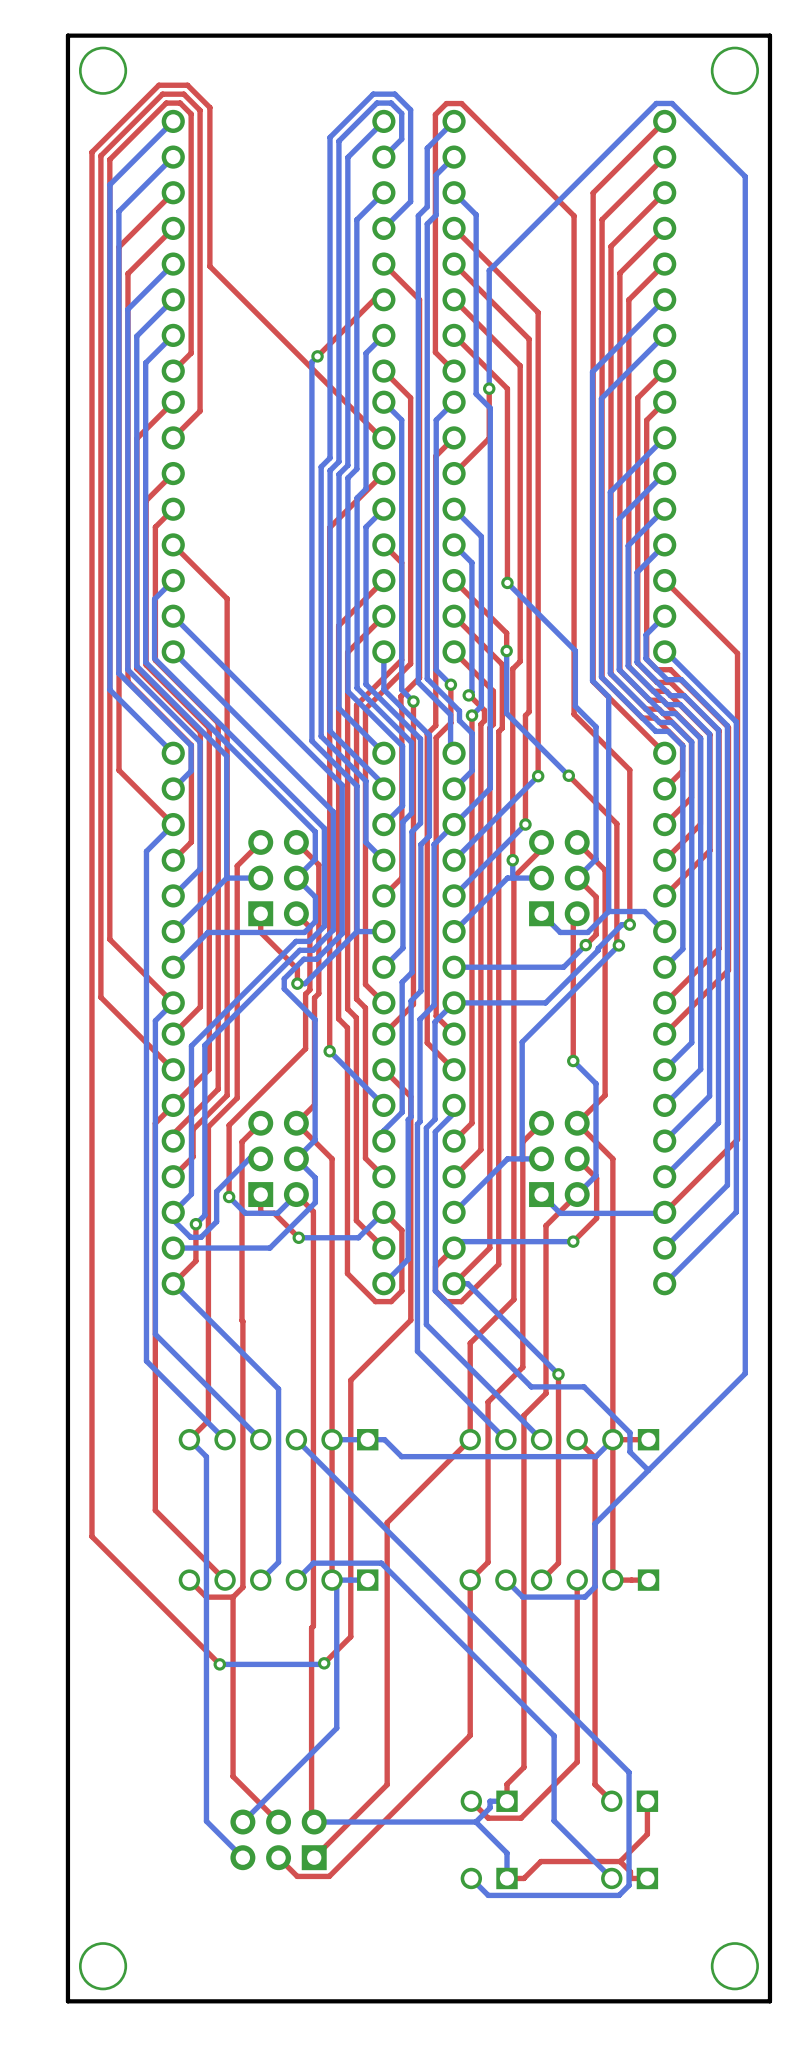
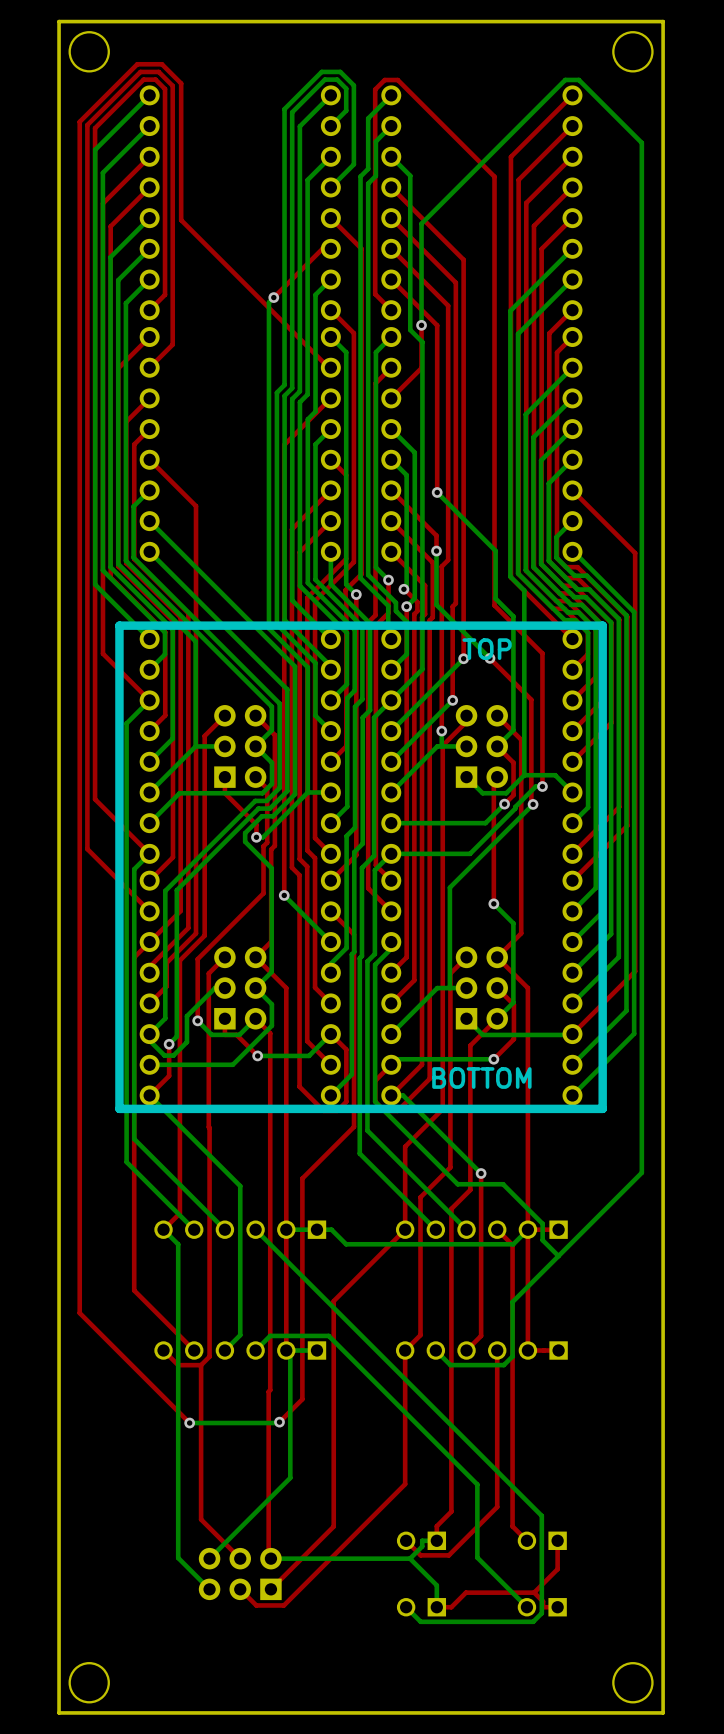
line: none -> (602, 625) (602, 1108) (119, 1108) (119, 625) (602, 625)
text: none -> TOP (487, 649)
text: none -> BOTTOM (481, 1078)

